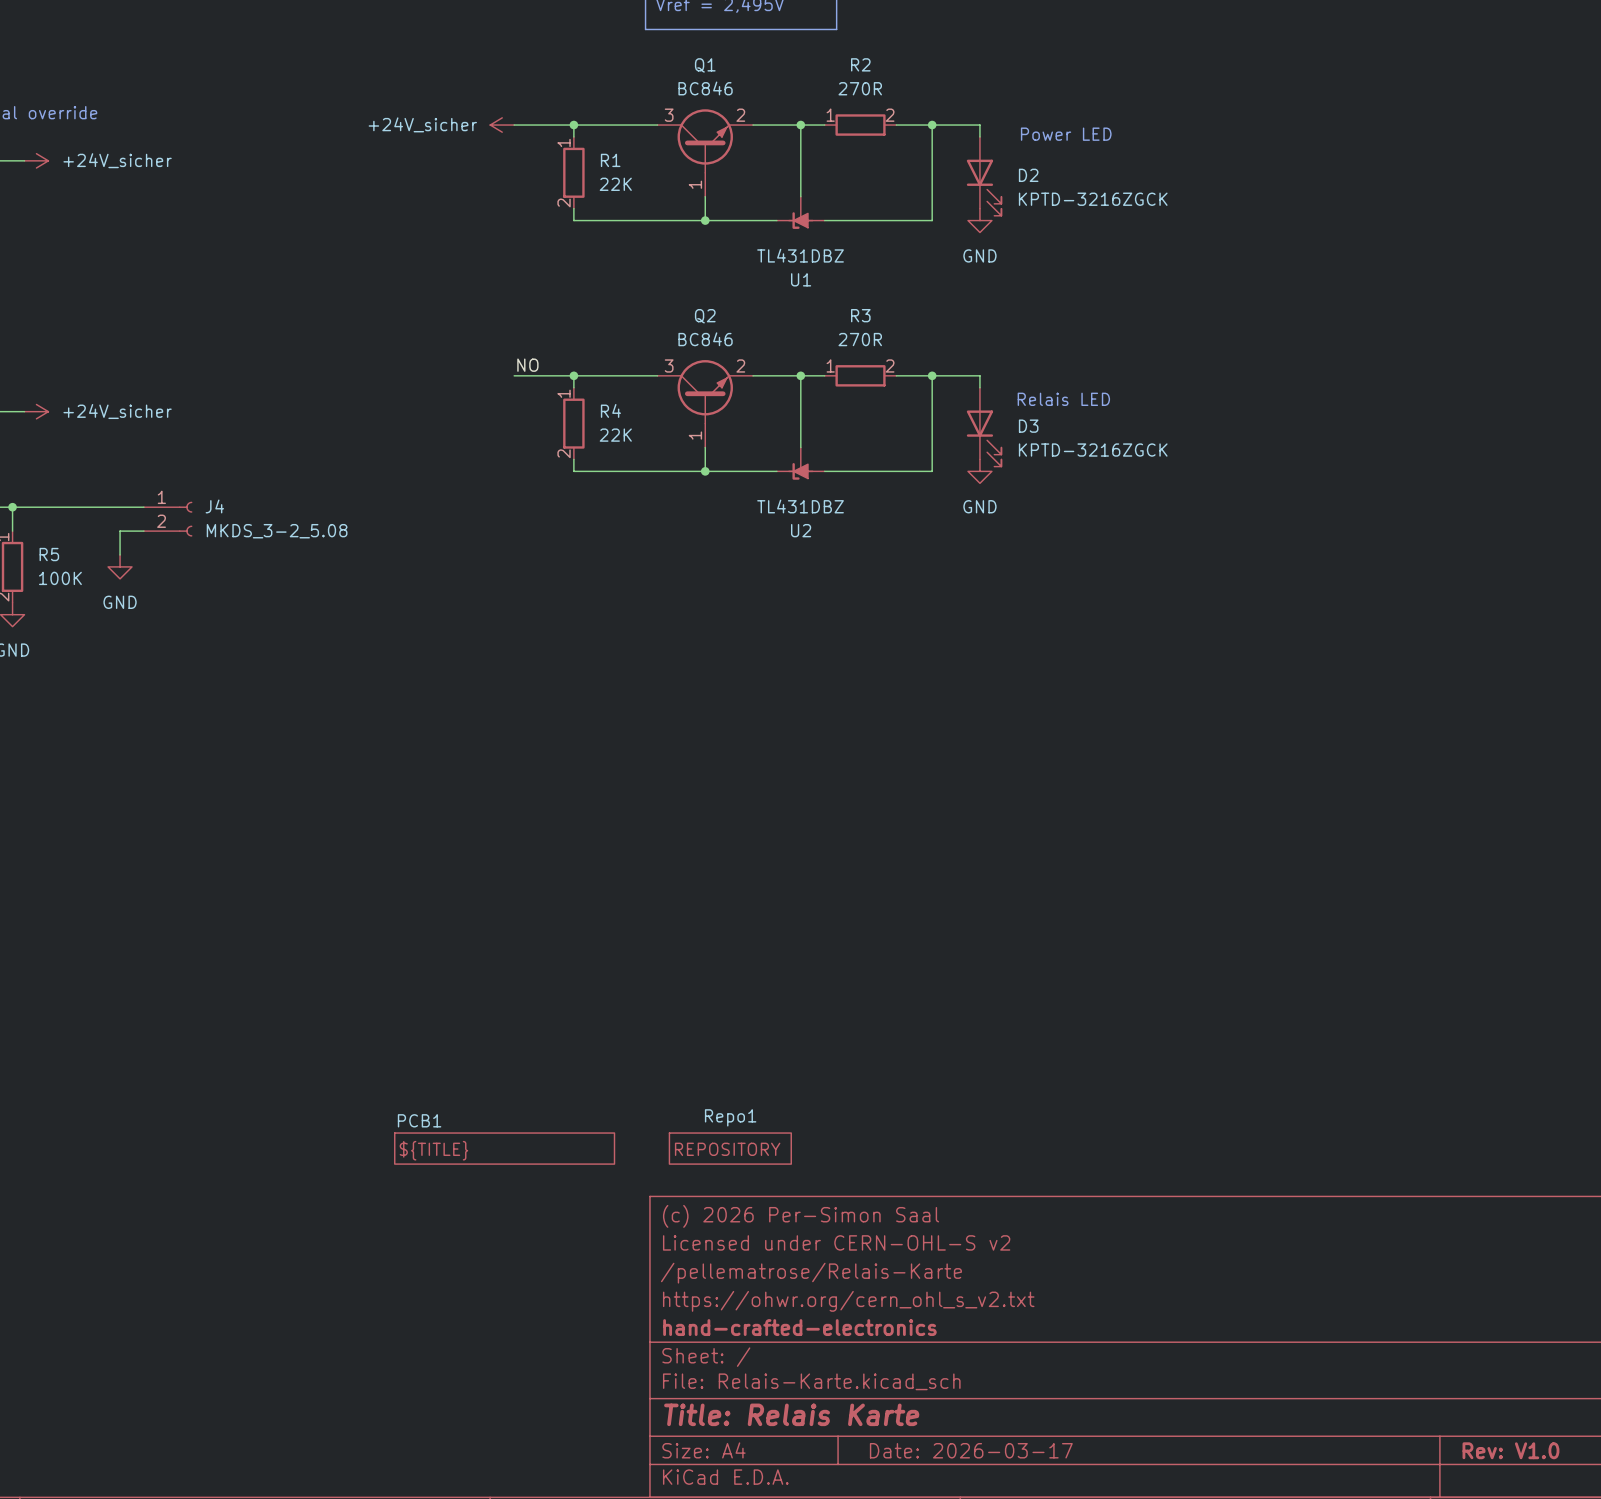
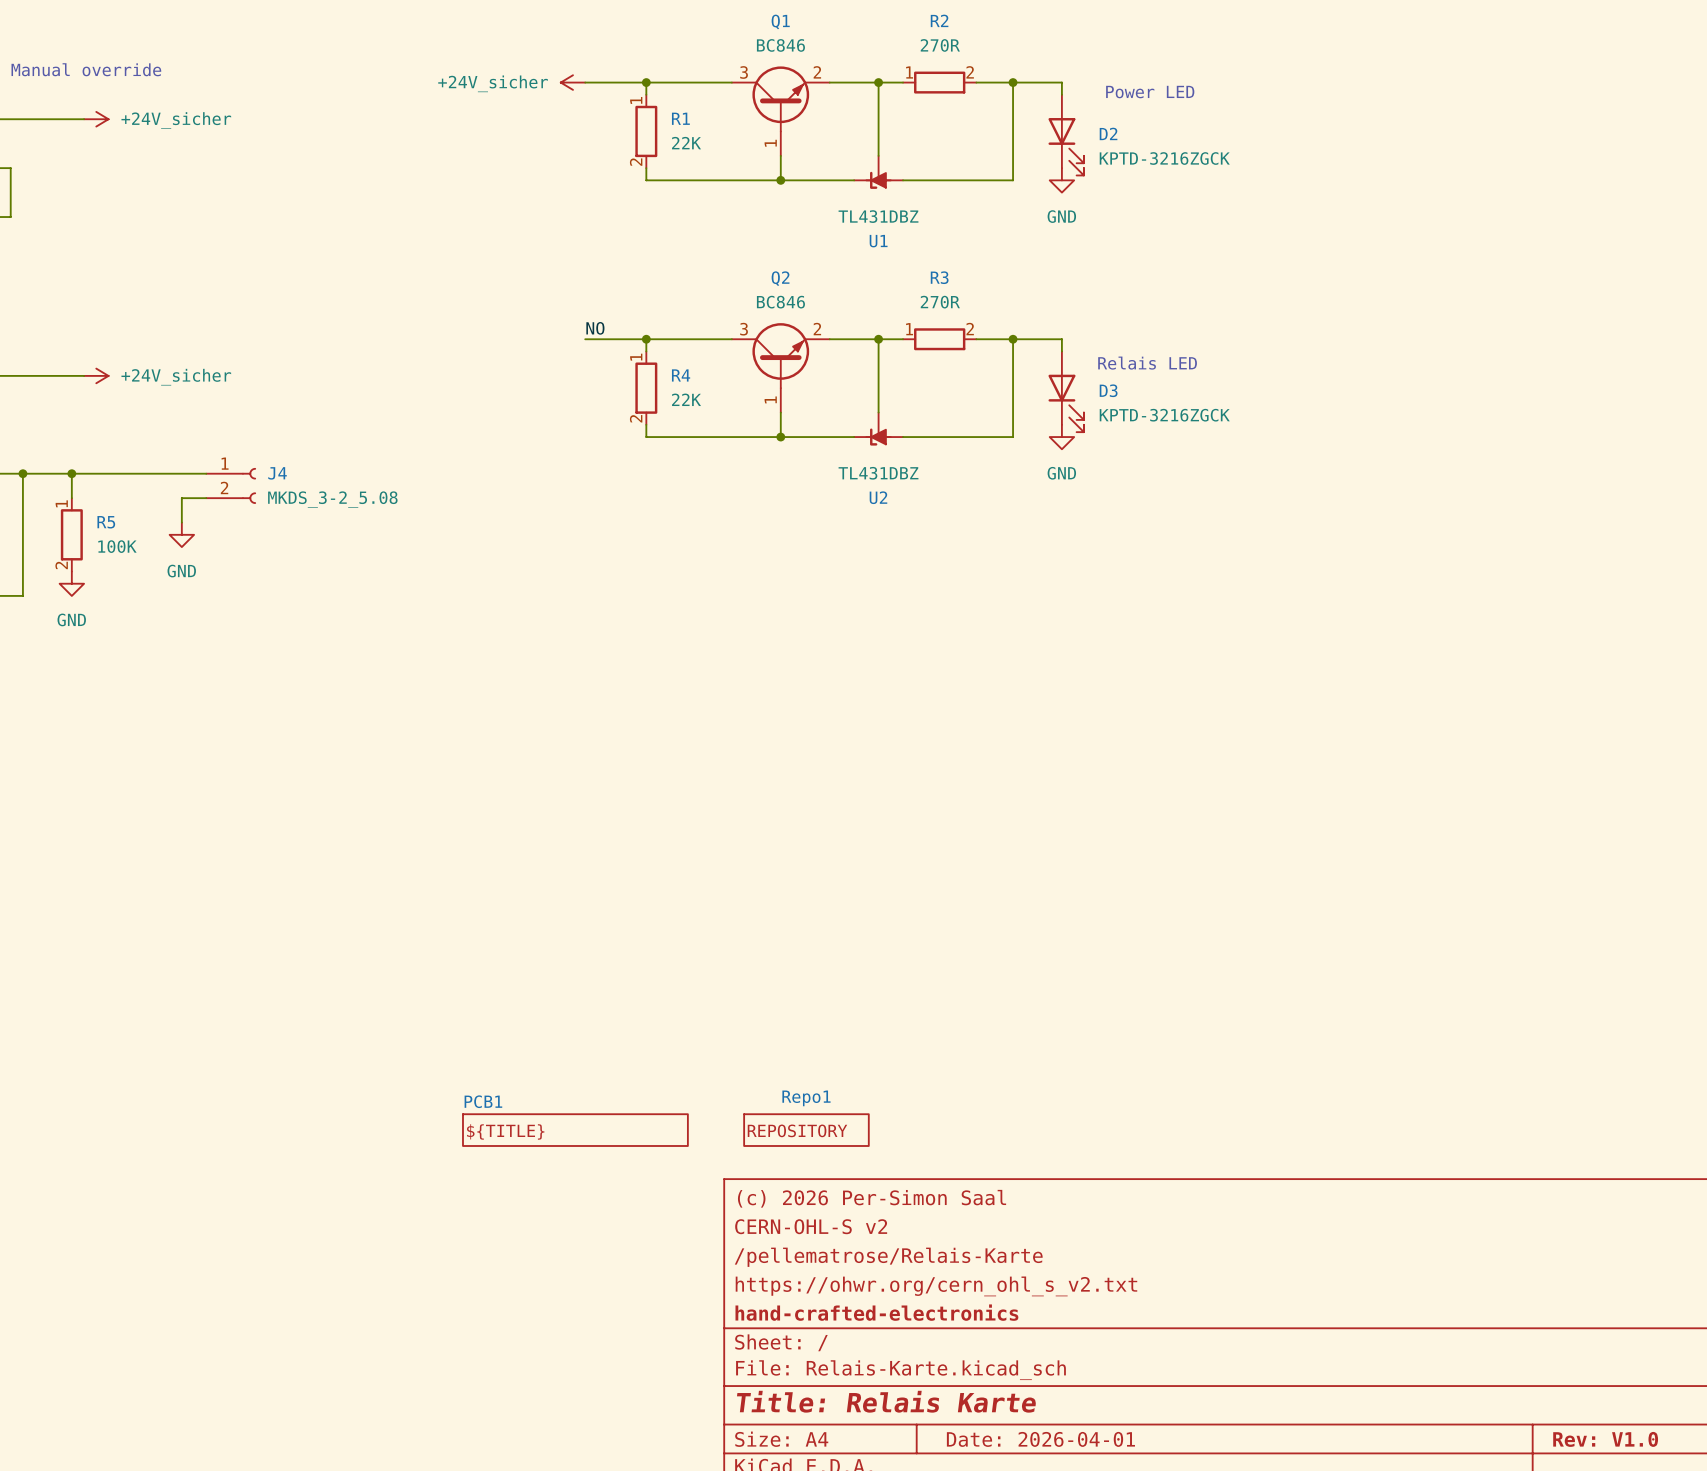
title block: Licensed under CERN-OHL-S v2 (836, 1242) -> CERN-OHL-S v2 (811, 1226)
title block: Date: 2026-03-17 (971, 1450) -> Date: 2026-04-01 (1040, 1439)

